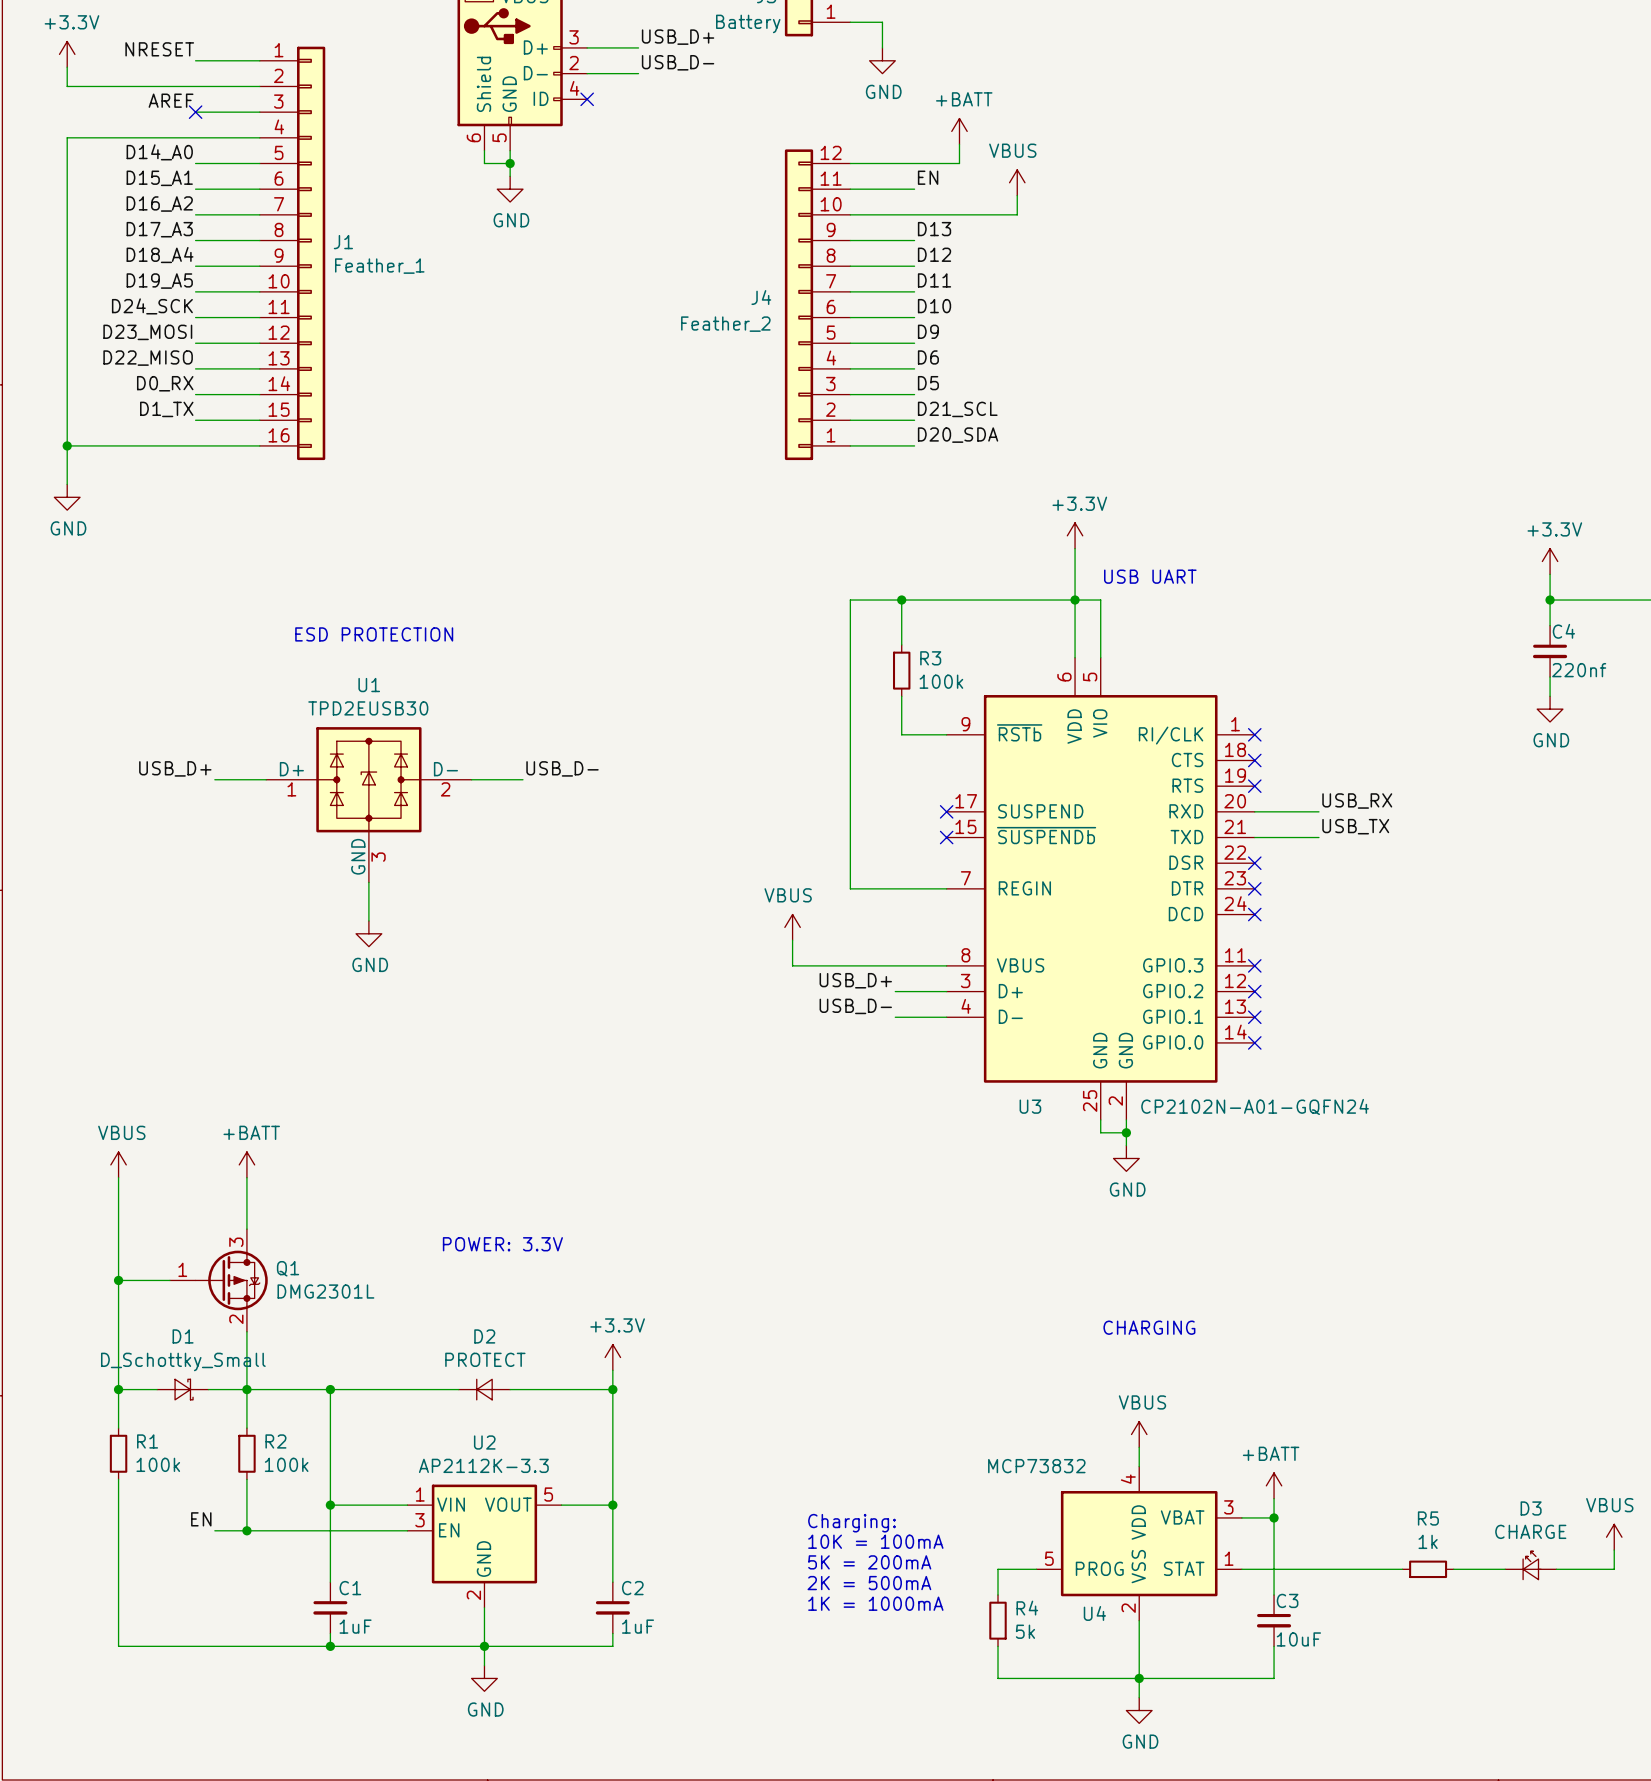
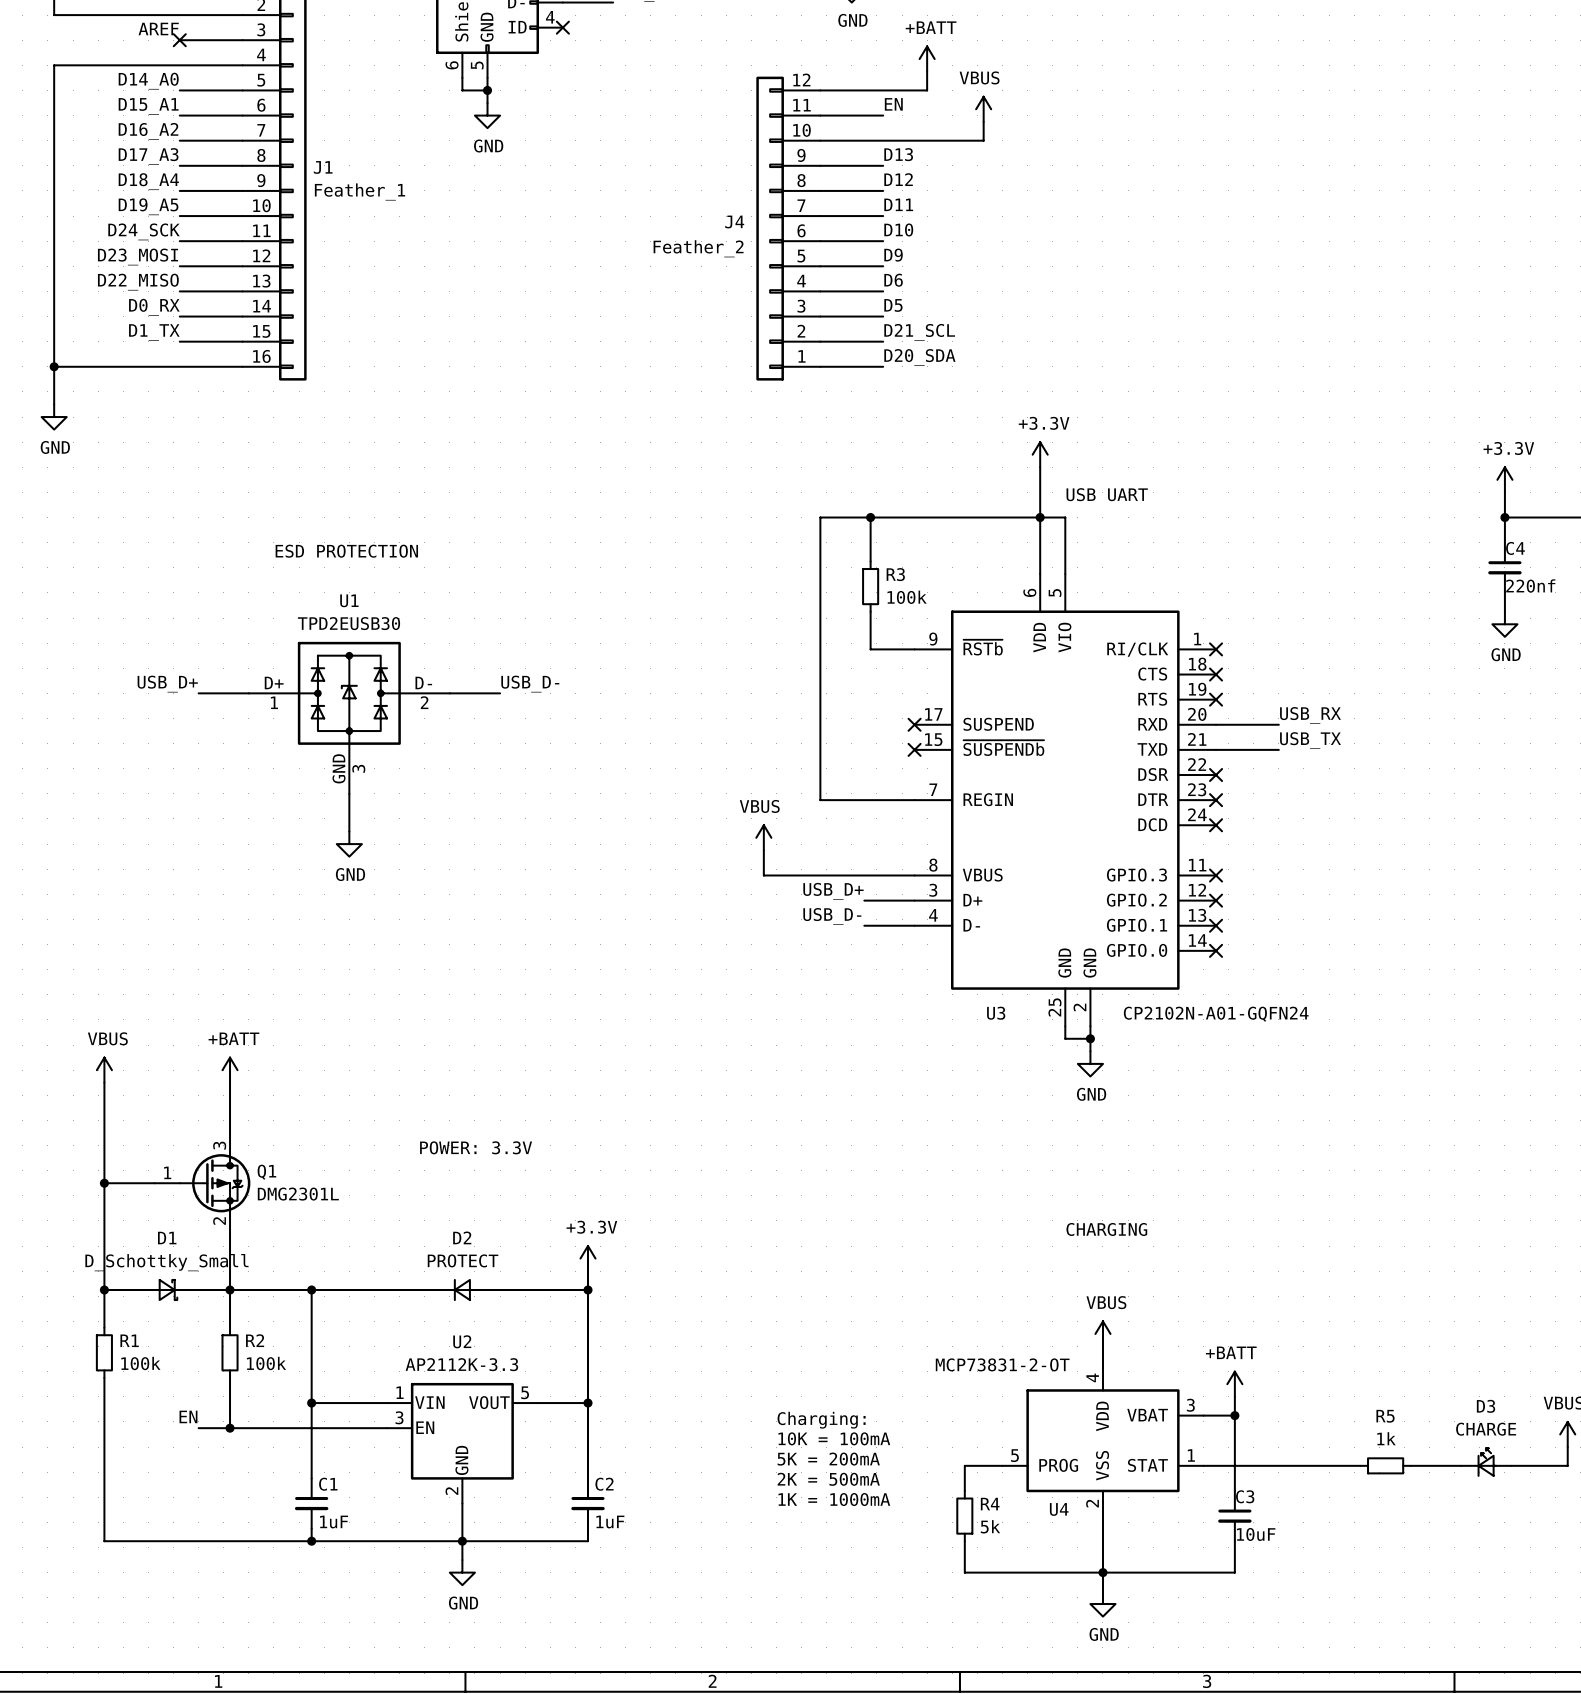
U4 value: MCP73832 (1036, 1466) -> MCP73831-2-OT (1002, 1364)

